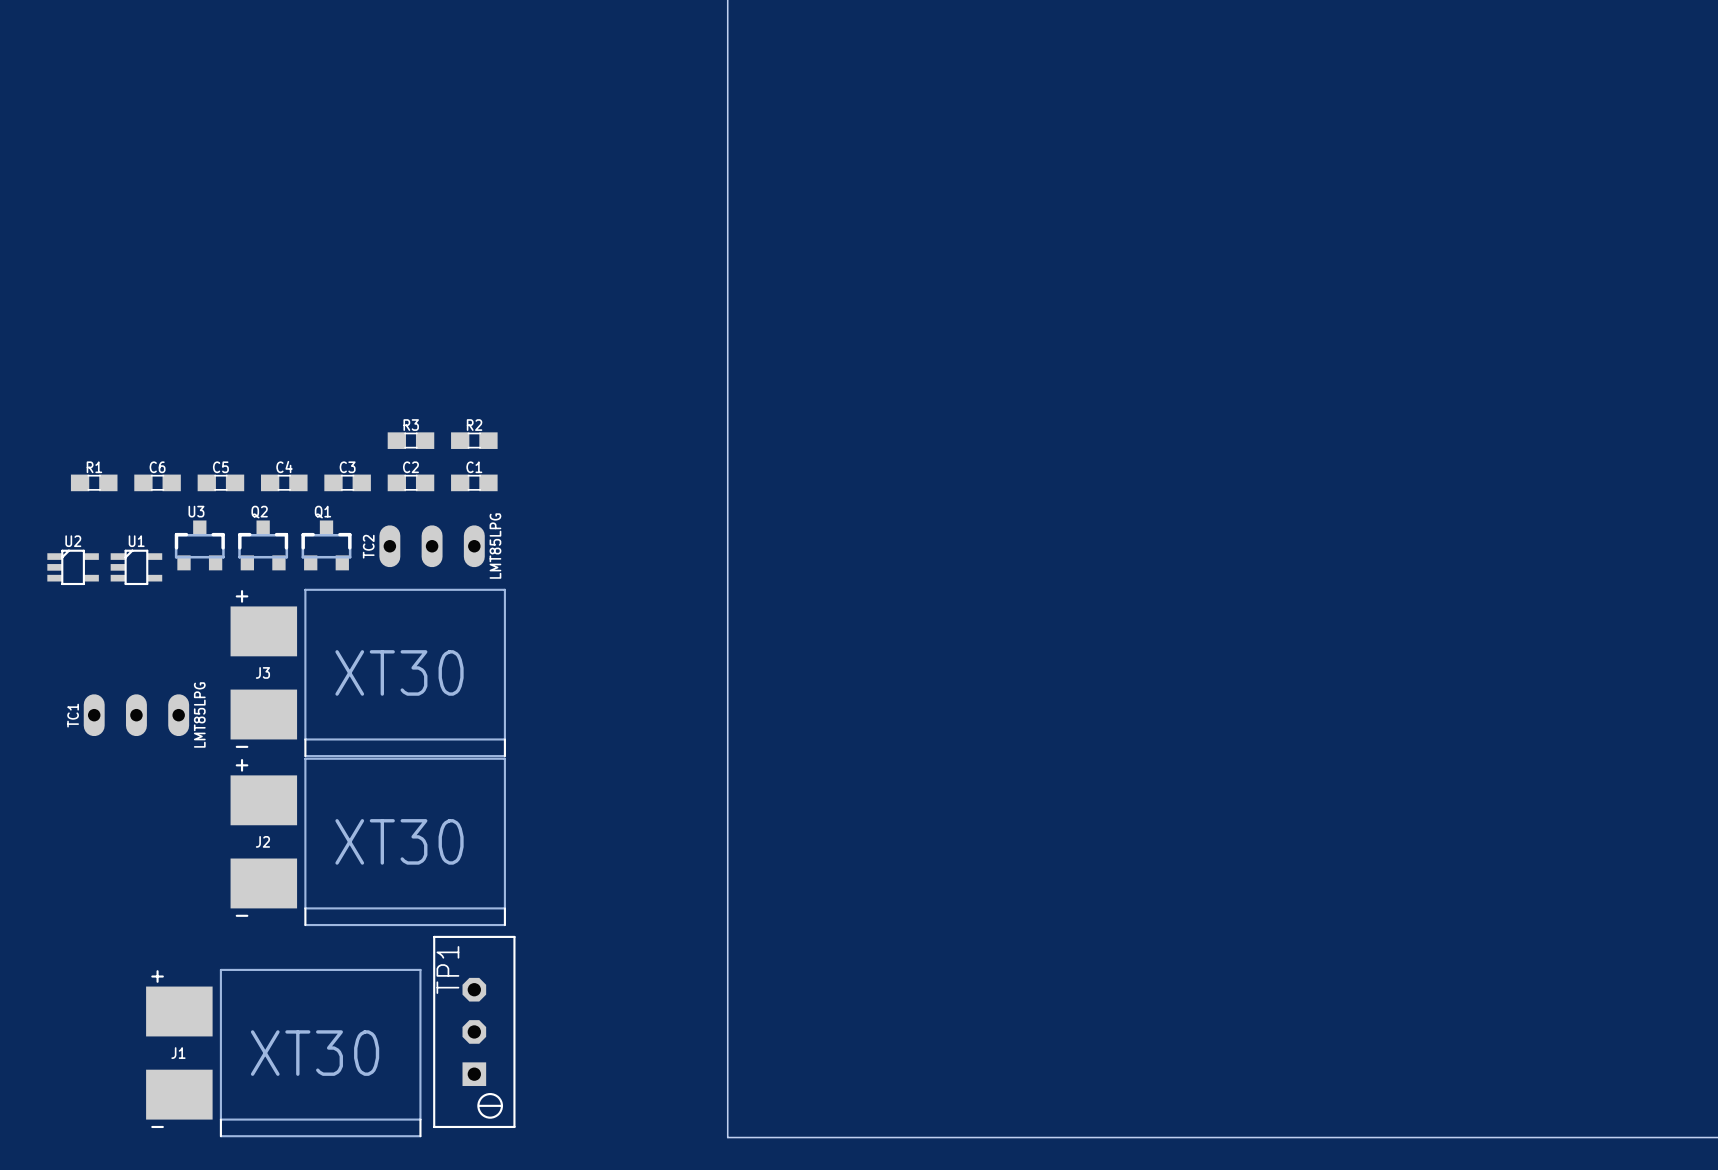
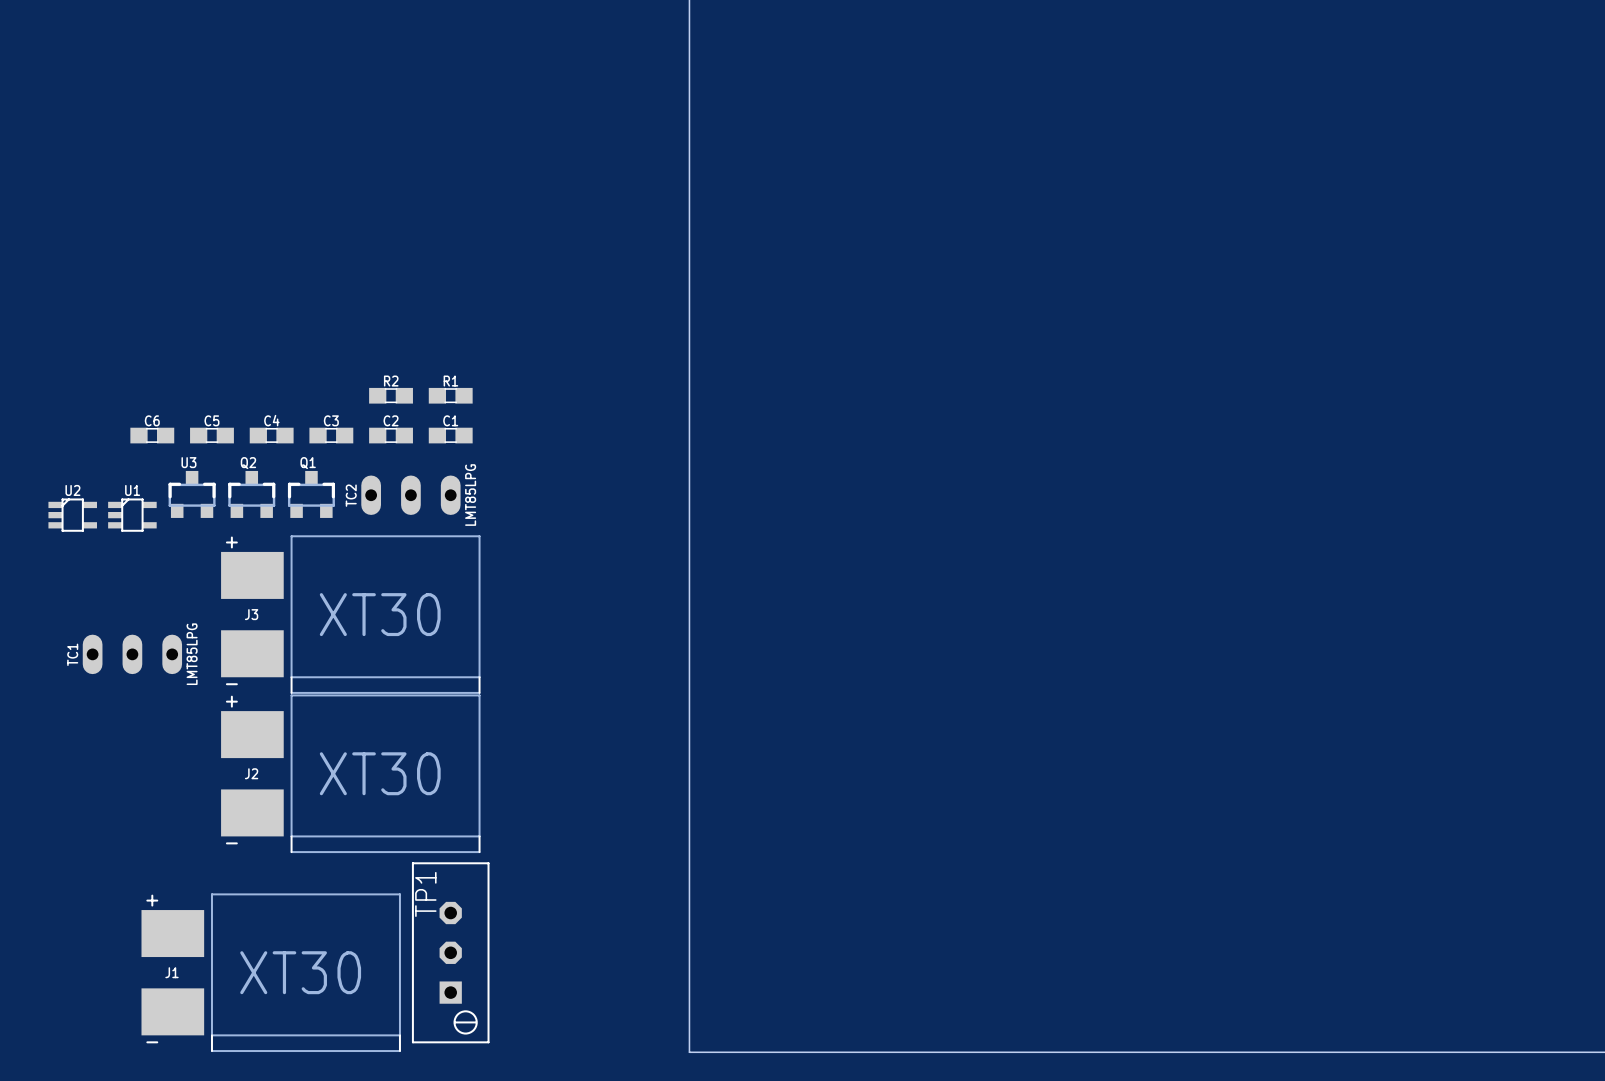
R3 name: R3 (411, 425) -> R2 (391, 381)
R2 name: R2 (474, 425) -> R1 (450, 381)
R1: (94, 482) -> none

